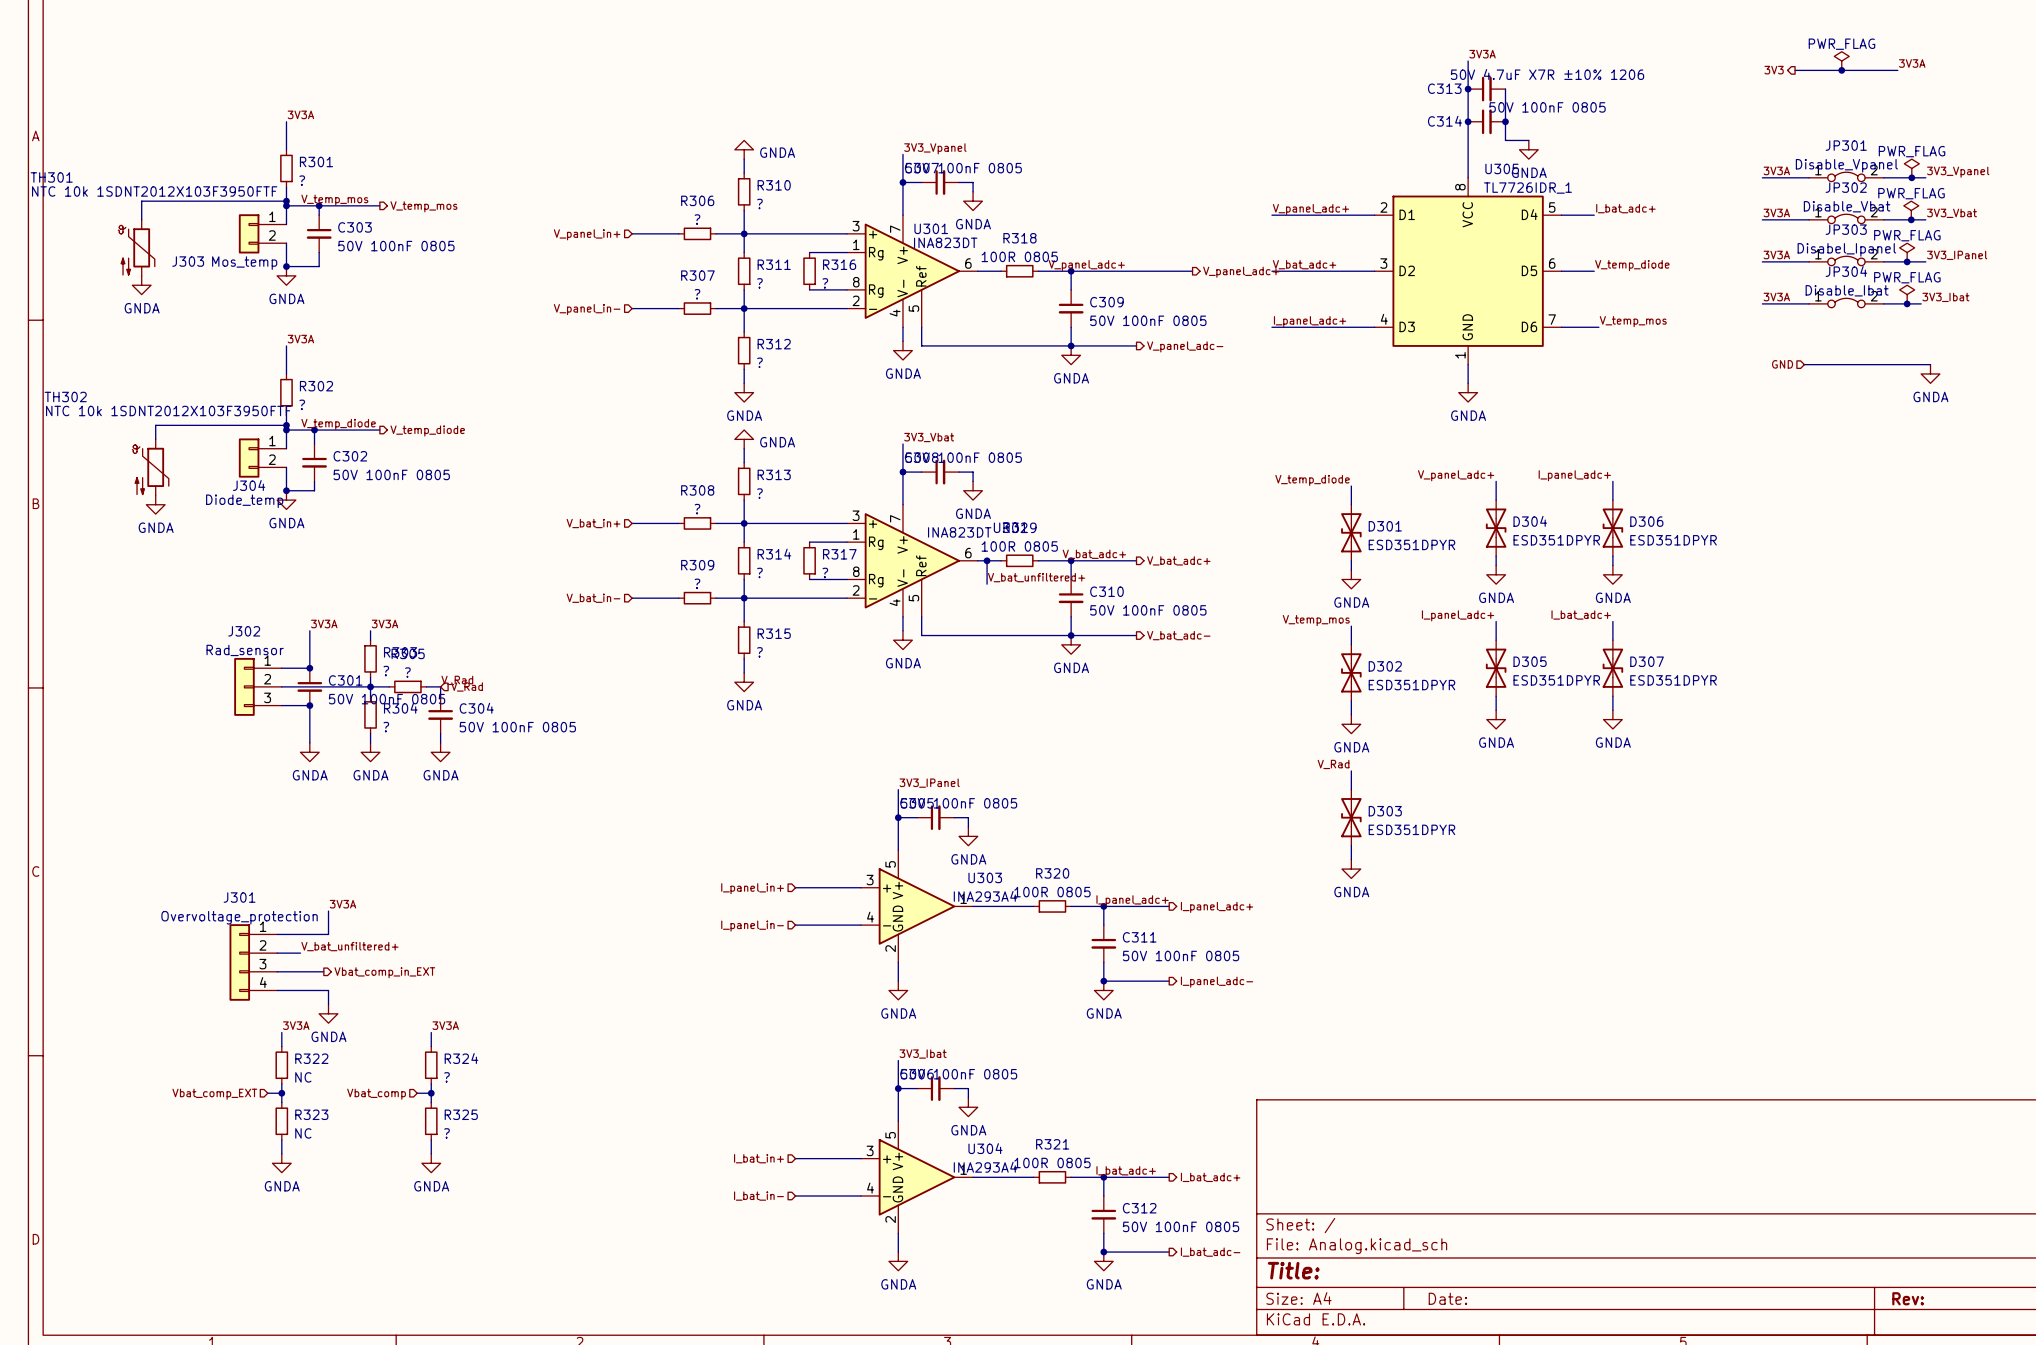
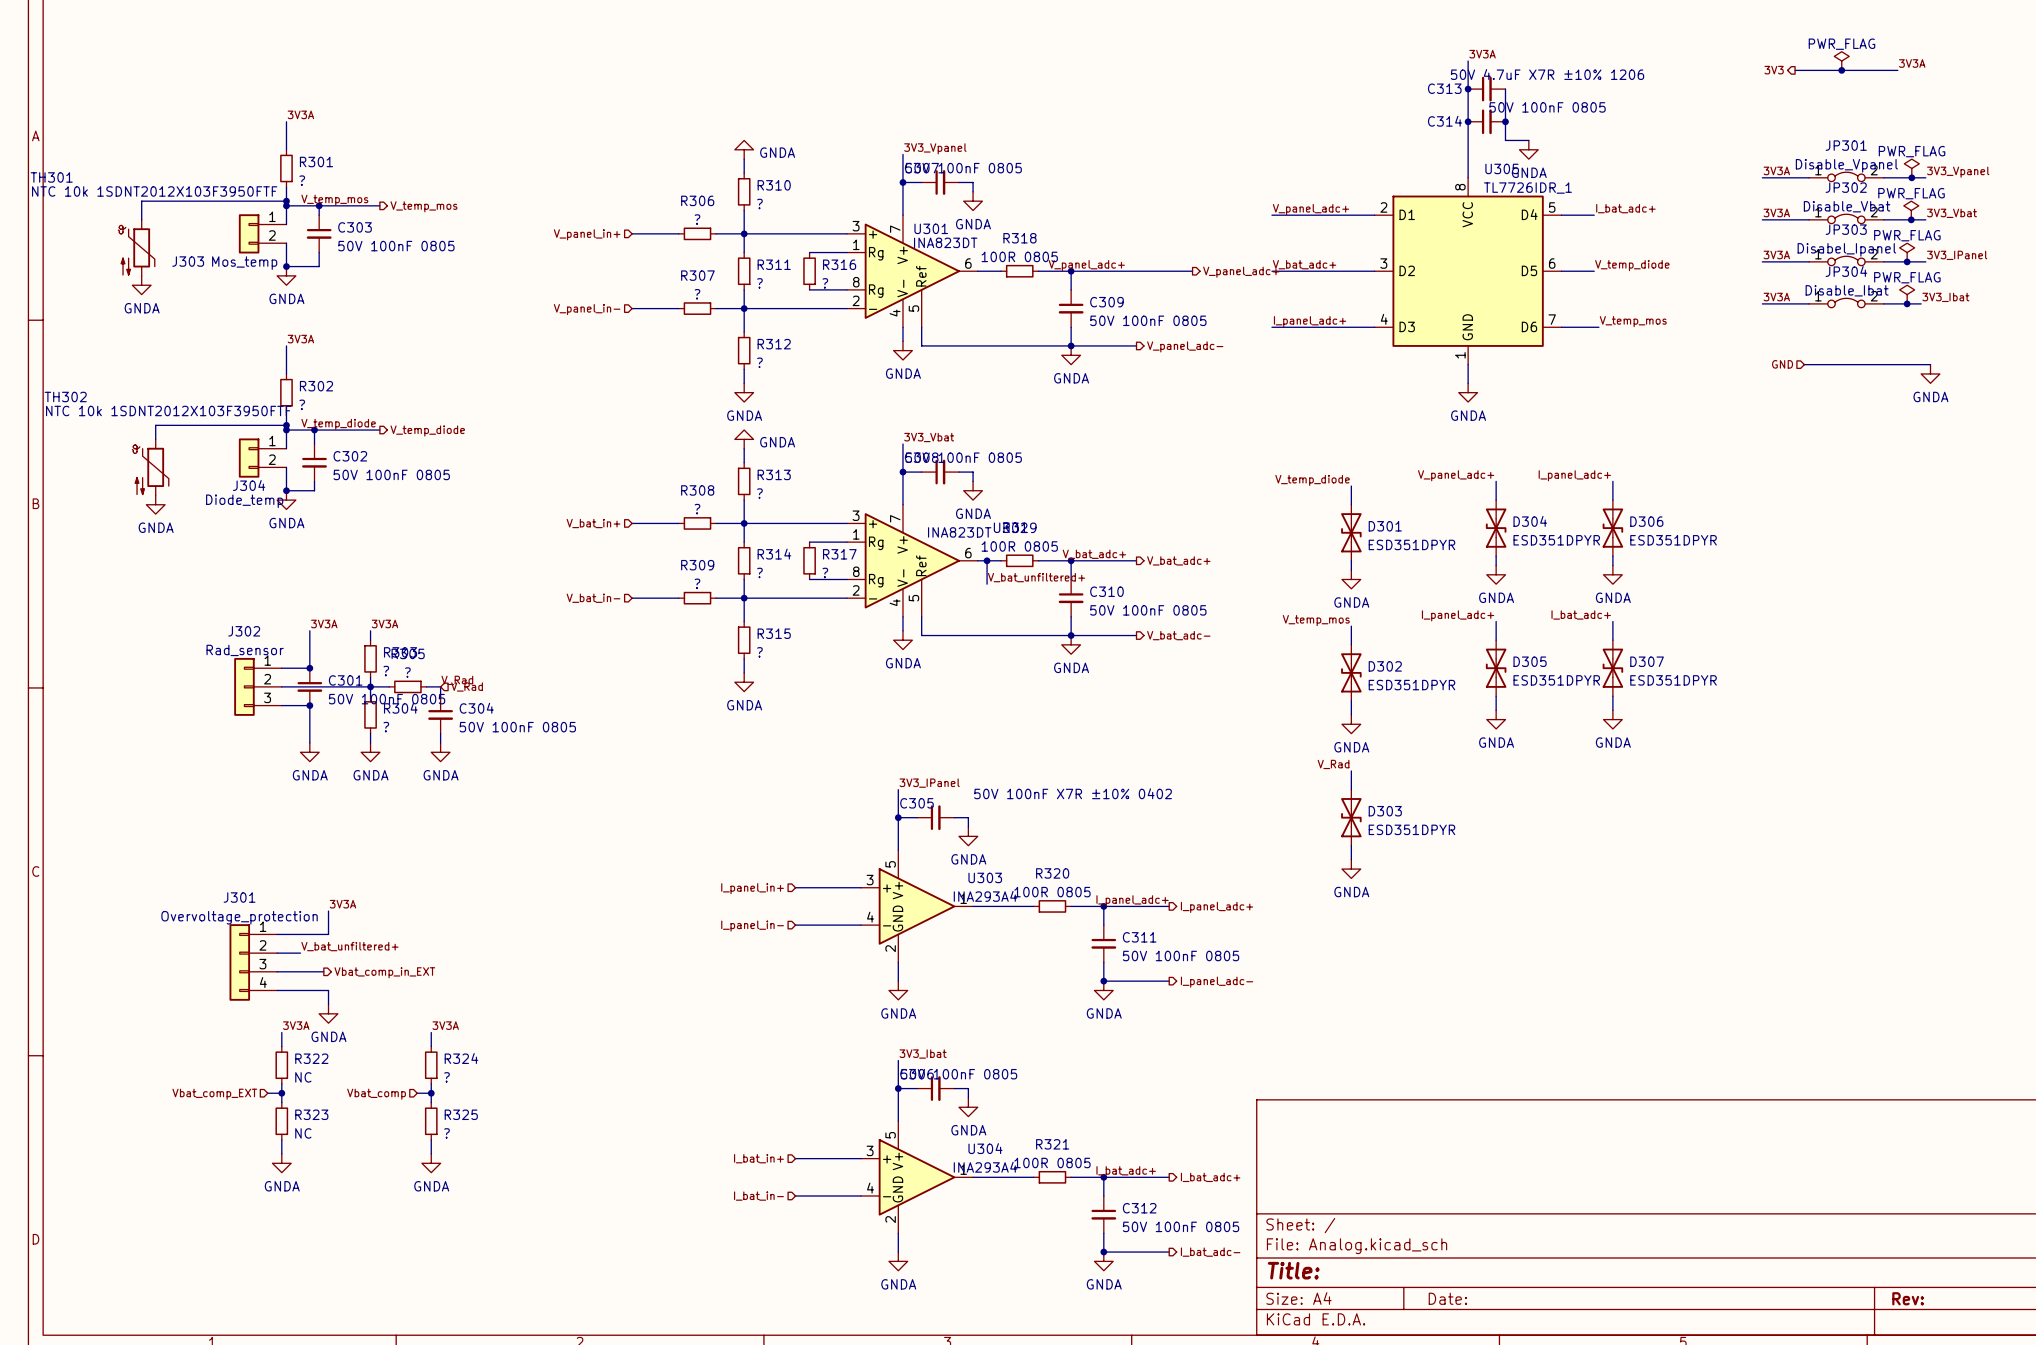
C305 value: 50V 100nF 0805 (959, 803) -> 50V 100nF X7R ±10% 0402 (1073, 793)

